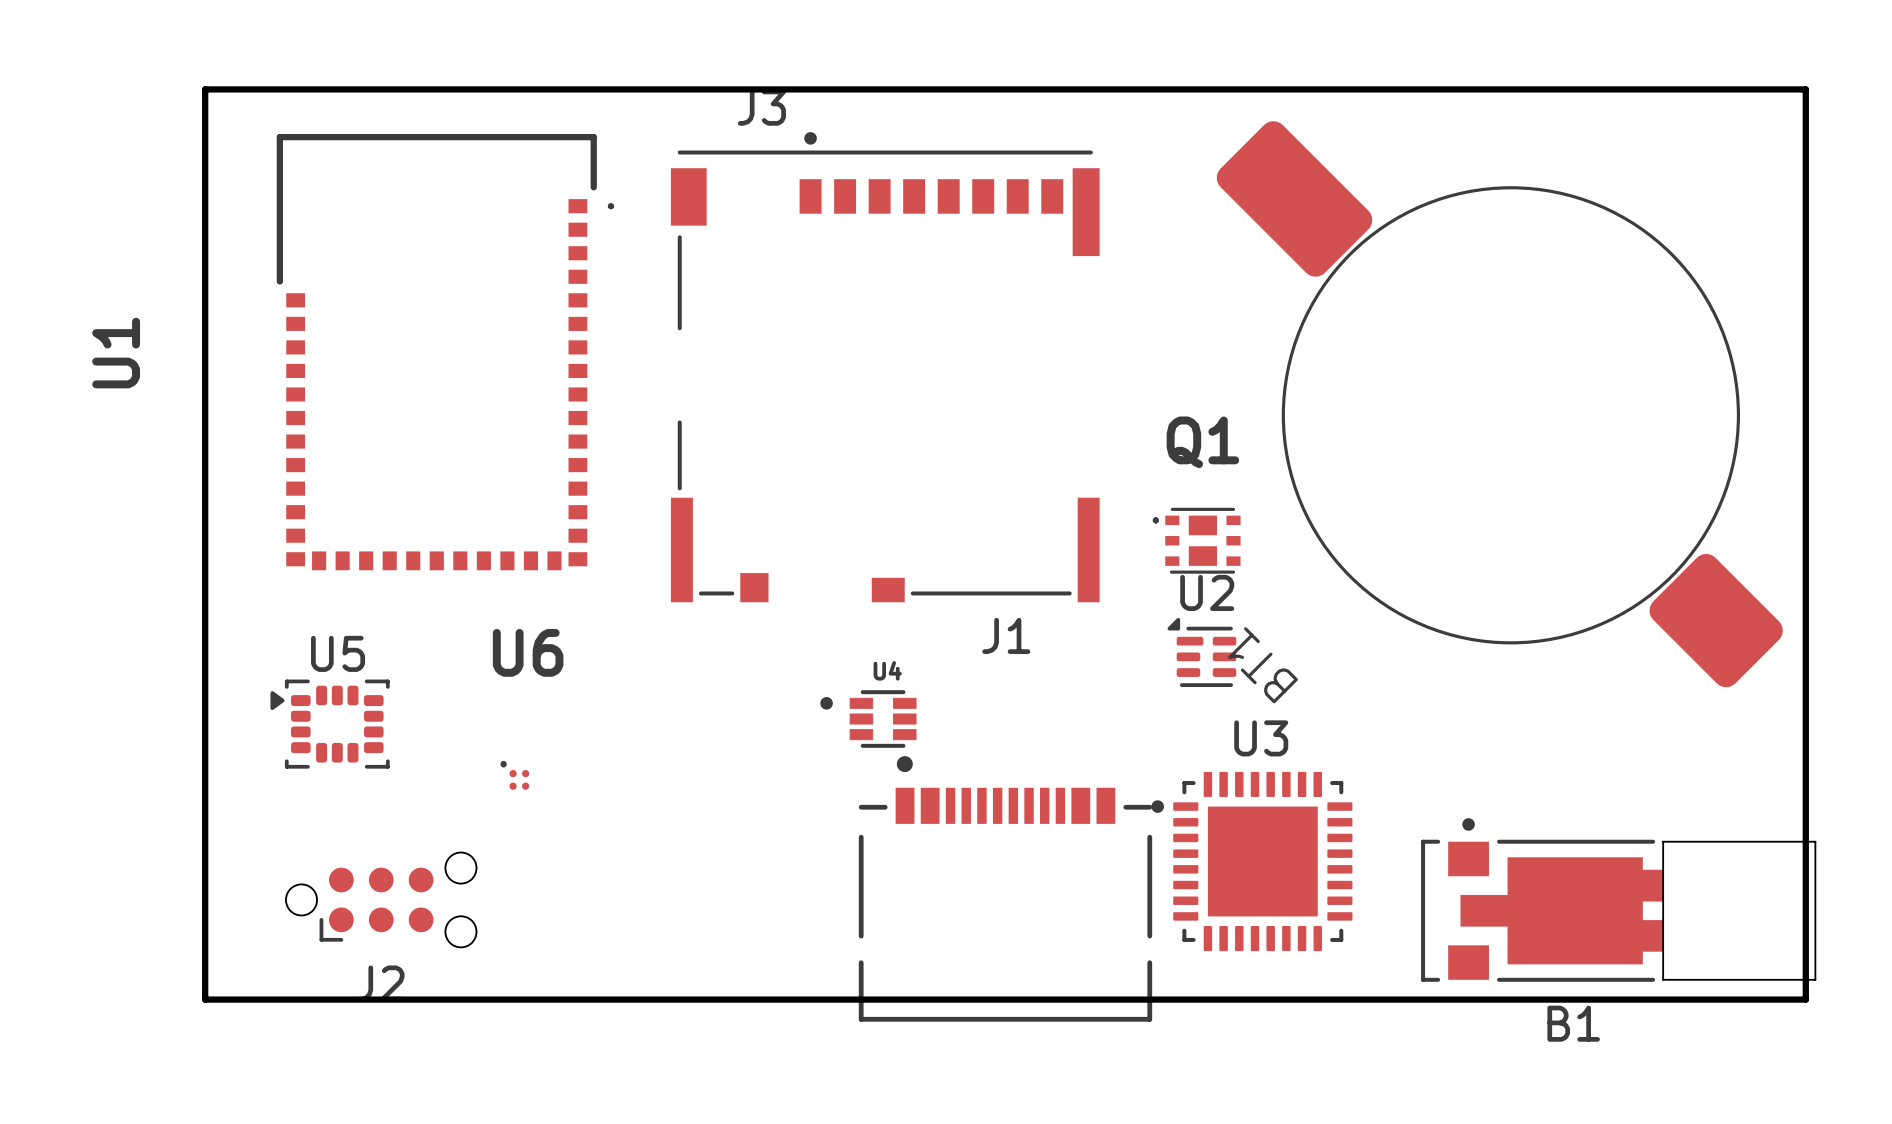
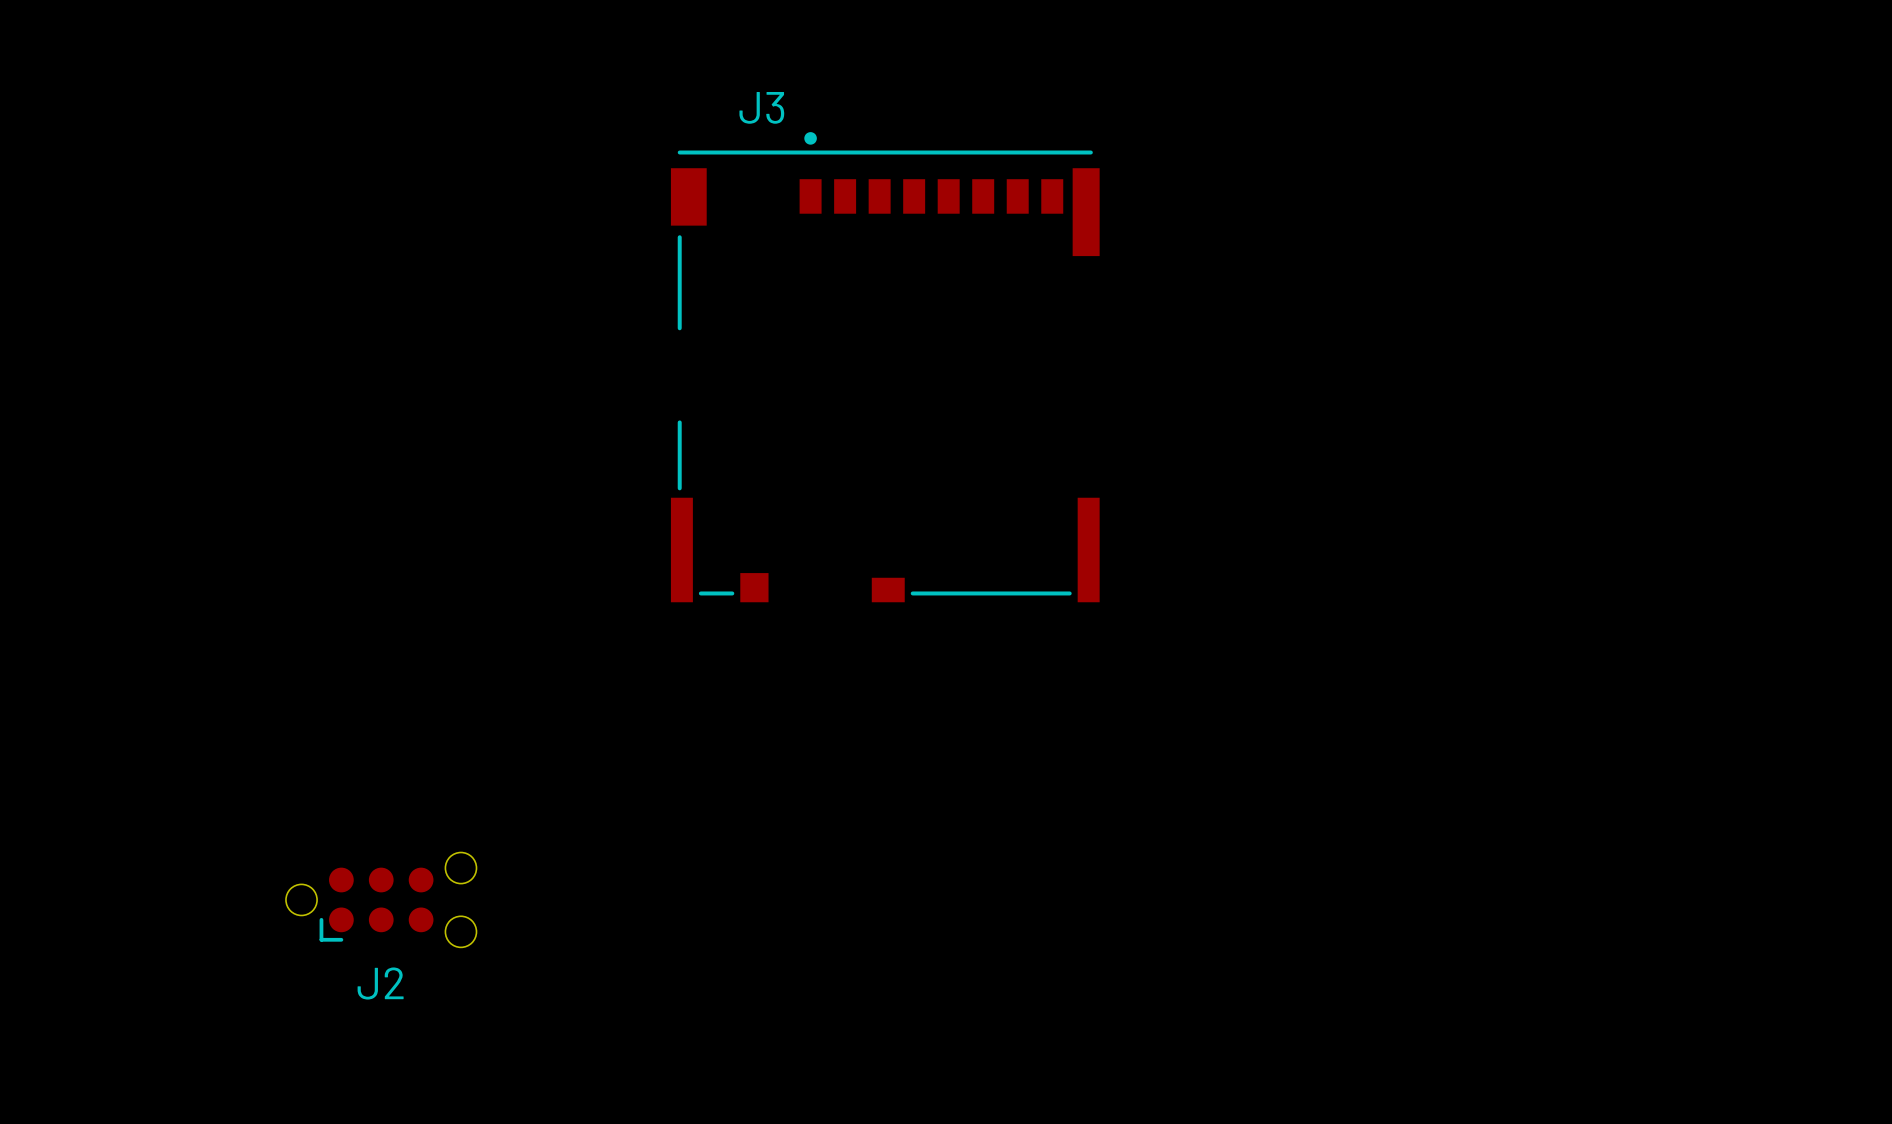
board edge: (205, 89) (1805, 89) (1805, 999) (205, 999) (205, 89) -> none
U1: (445, 352) -> none
BT1: (1499, 404) -> none
Q1: (1196, 540) -> none
U2: (1201, 652) -> none
U4: (868, 719) -> none
U5: (330, 724) -> none
U6: (514, 775) -> none
U3: (1251, 861) -> none
J1: (1005, 888) -> none
B1: (1618, 899) -> none

